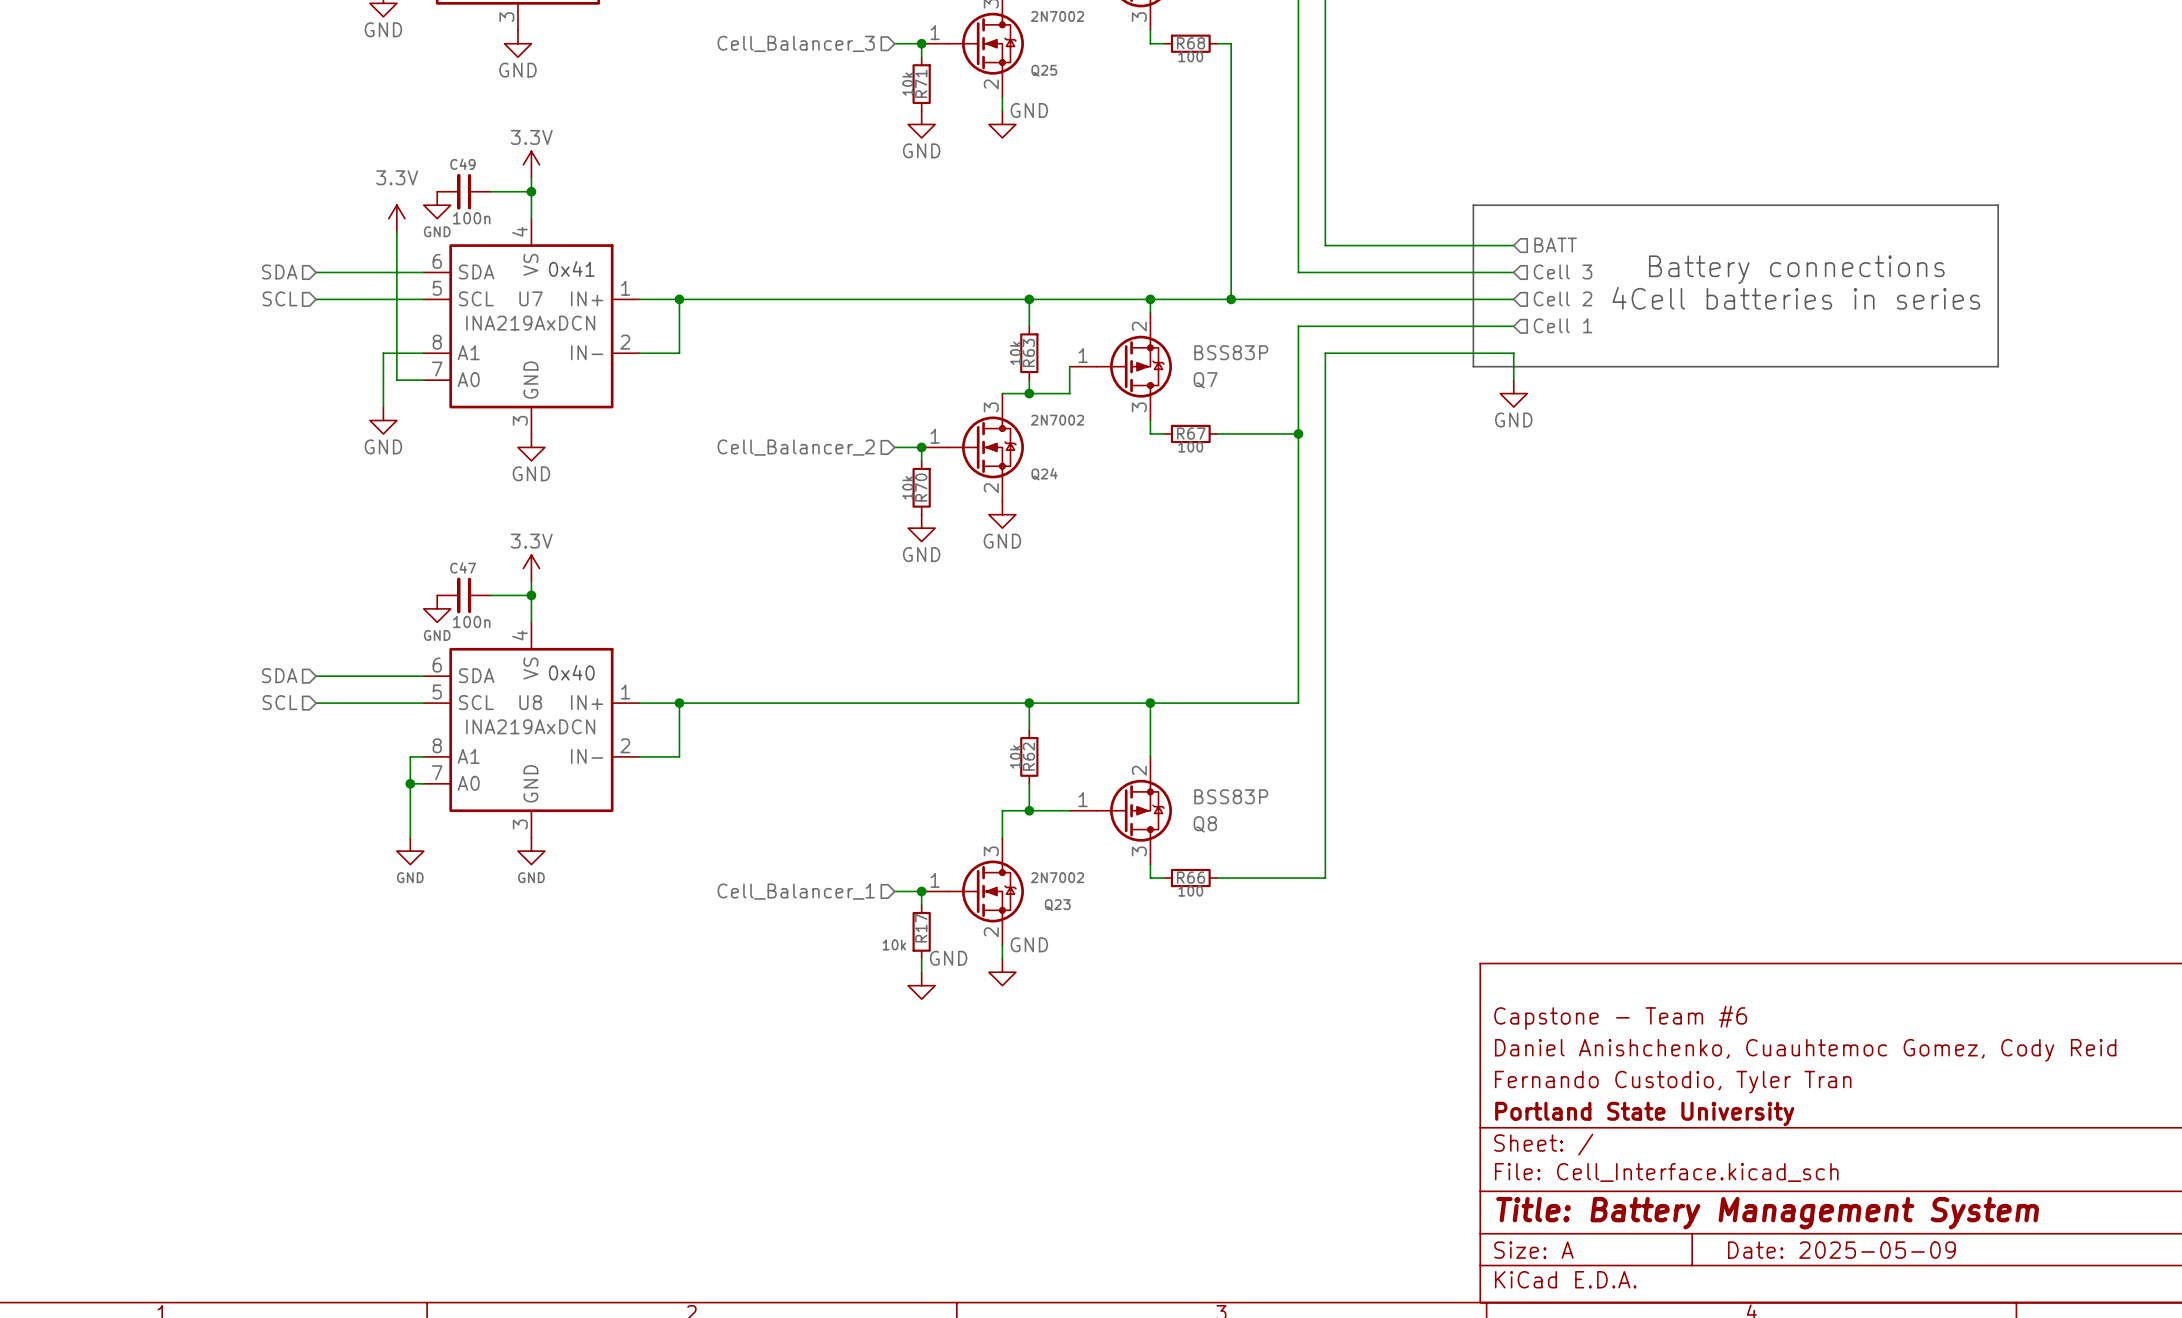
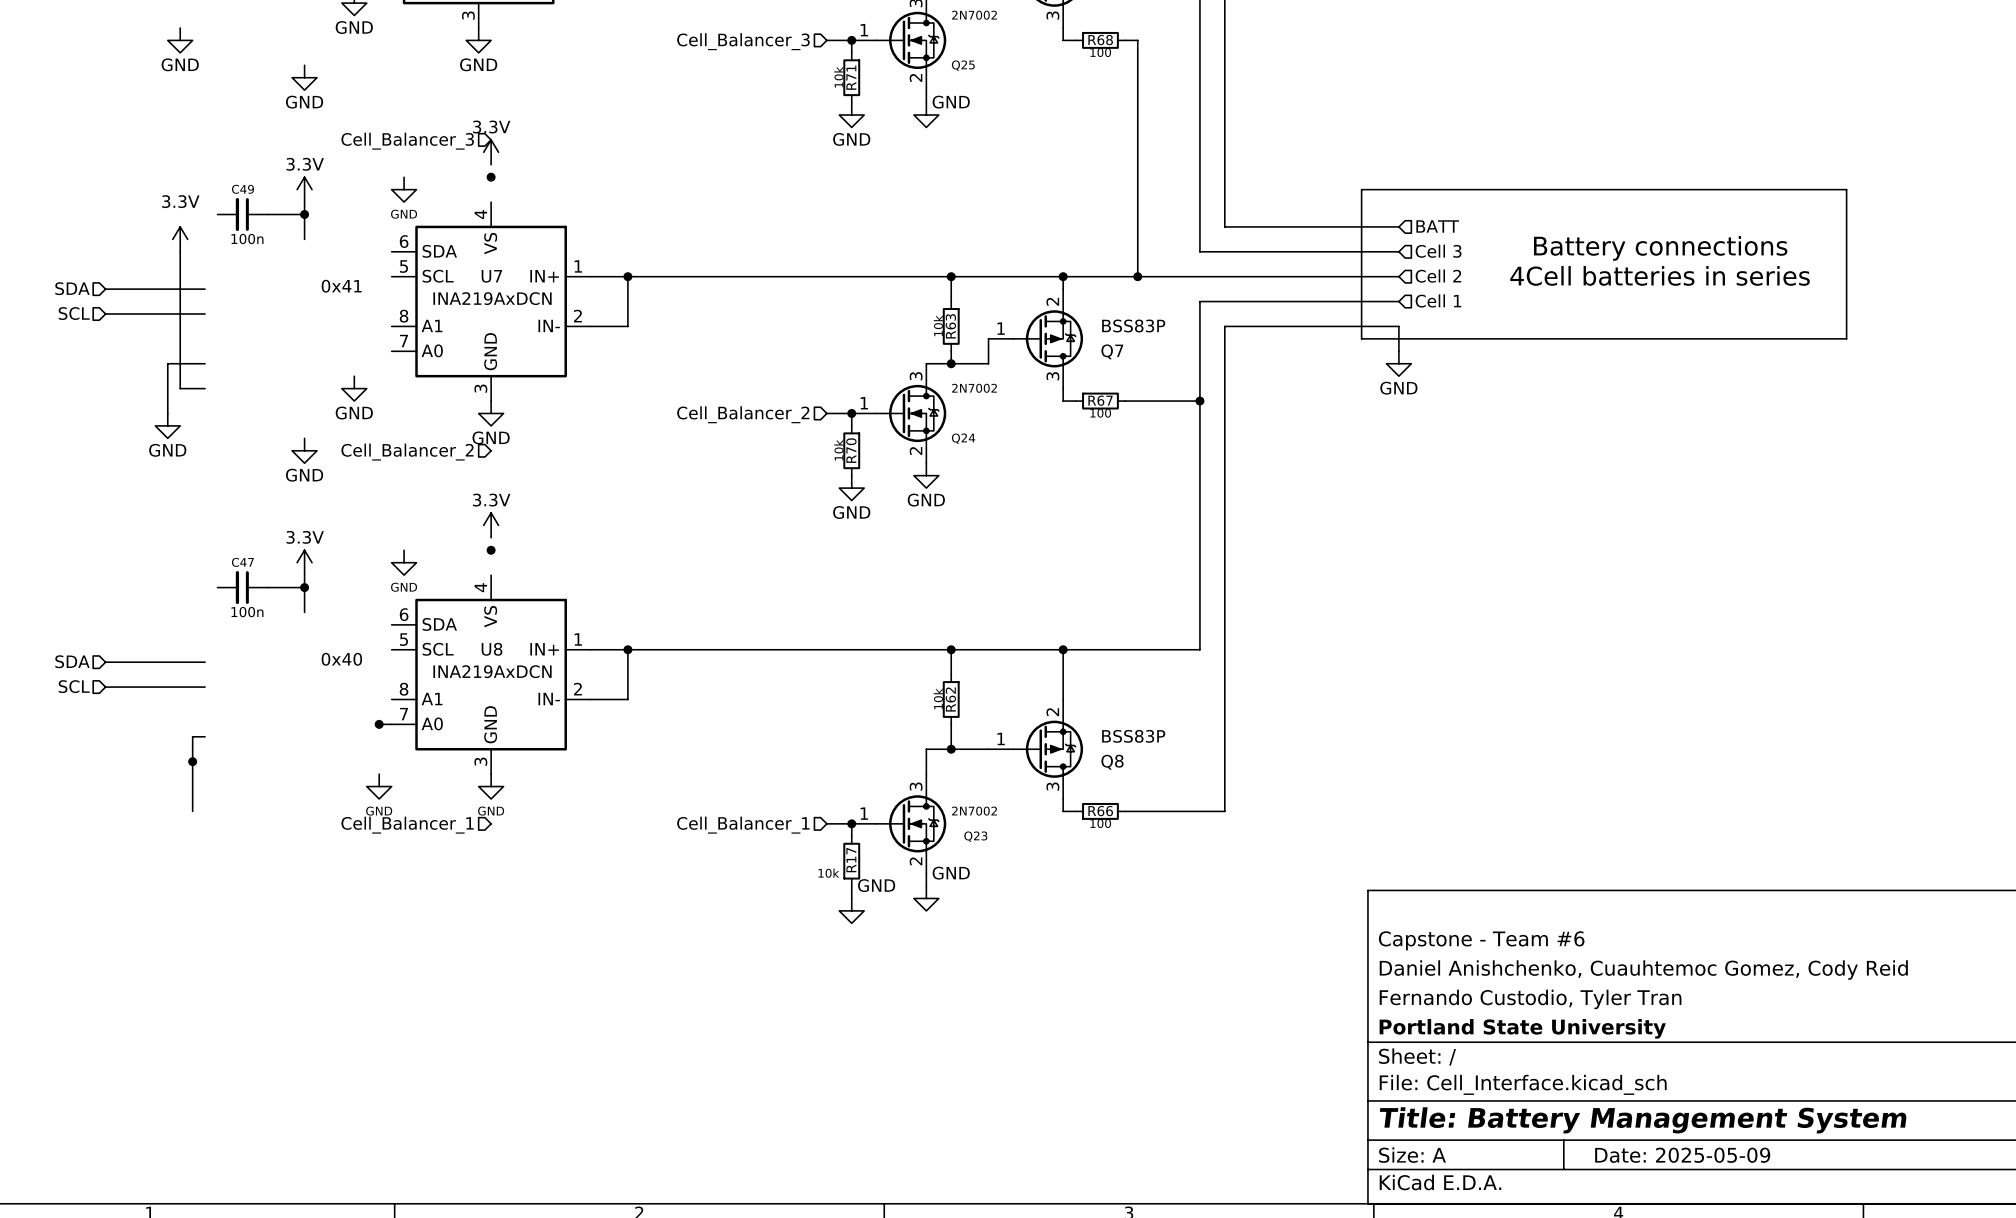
power symbol: none -> GND (180, 40)
power symbol: none -> GND (304, 77)
hierarchical label: none -> Cell_Balancer_3 (407, 141)
power symbol text position: 3.3V (397, 177) -> 3.3V (305, 164)
wire: (531, 178) (531, 218) -> (304, 202) (304, 239)
C49 position: (464, 191) -> (242, 214)
wire: (491, 191) (531, 191) -> (267, 214) (304, 214)
power symbol position: 3.3V (396, 218) -> 3.3V (304, 189)
junction: none -> (304, 214)
wire: (396, 232) (396, 380) (423, 380) -> (180, 251) (180, 388) (205, 388)
power symbol: none -> 3.3V (180, 239)
text position: 0x41 (571, 269) -> 0x41 (341, 286)
hierarchical label position: SDA (279, 271) -> SDA (72, 288)
wire: (316, 272) (423, 272) -> (105, 289) (205, 289)
hierarchical label position: SCL (280, 298) -> SCL (74, 313)
wire: (316, 299) (423, 299) -> (105, 313) (205, 313)
wire: (423, 353) (383, 353) (383, 407) -> (205, 363) (167, 363) (167, 413)
power symbol: none -> GND (167, 425)
power symbol: none -> GND (304, 450)
hierarchical label: none -> Cell_Balancer_2 (407, 452)
wire: (531, 581) (531, 622) -> (304, 575) (304, 612)
C47 position: (464, 595) -> (242, 587)
wire: (491, 595) (531, 595) -> (267, 587) (304, 587)
power symbol: none -> 3.3V (304, 562)
junction: none -> (304, 587)
text position: 0x40 (571, 672) -> 0x40 (341, 659)
hierarchical label position: SDA (279, 675) -> SDA (72, 661)
wire: (316, 676) (423, 676) -> (105, 662) (205, 662)
hierarchical label position: SCL (280, 702) -> SCL (74, 686)
wire: (316, 703) (423, 703) -> (105, 687) (205, 687)
wire: (423, 756) (410, 756) (410, 837) -> (205, 736) (192, 736) (192, 811)
junction: none -> (192, 761)
hierarchical label: none -> Cell_Balancer_1 (407, 825)

